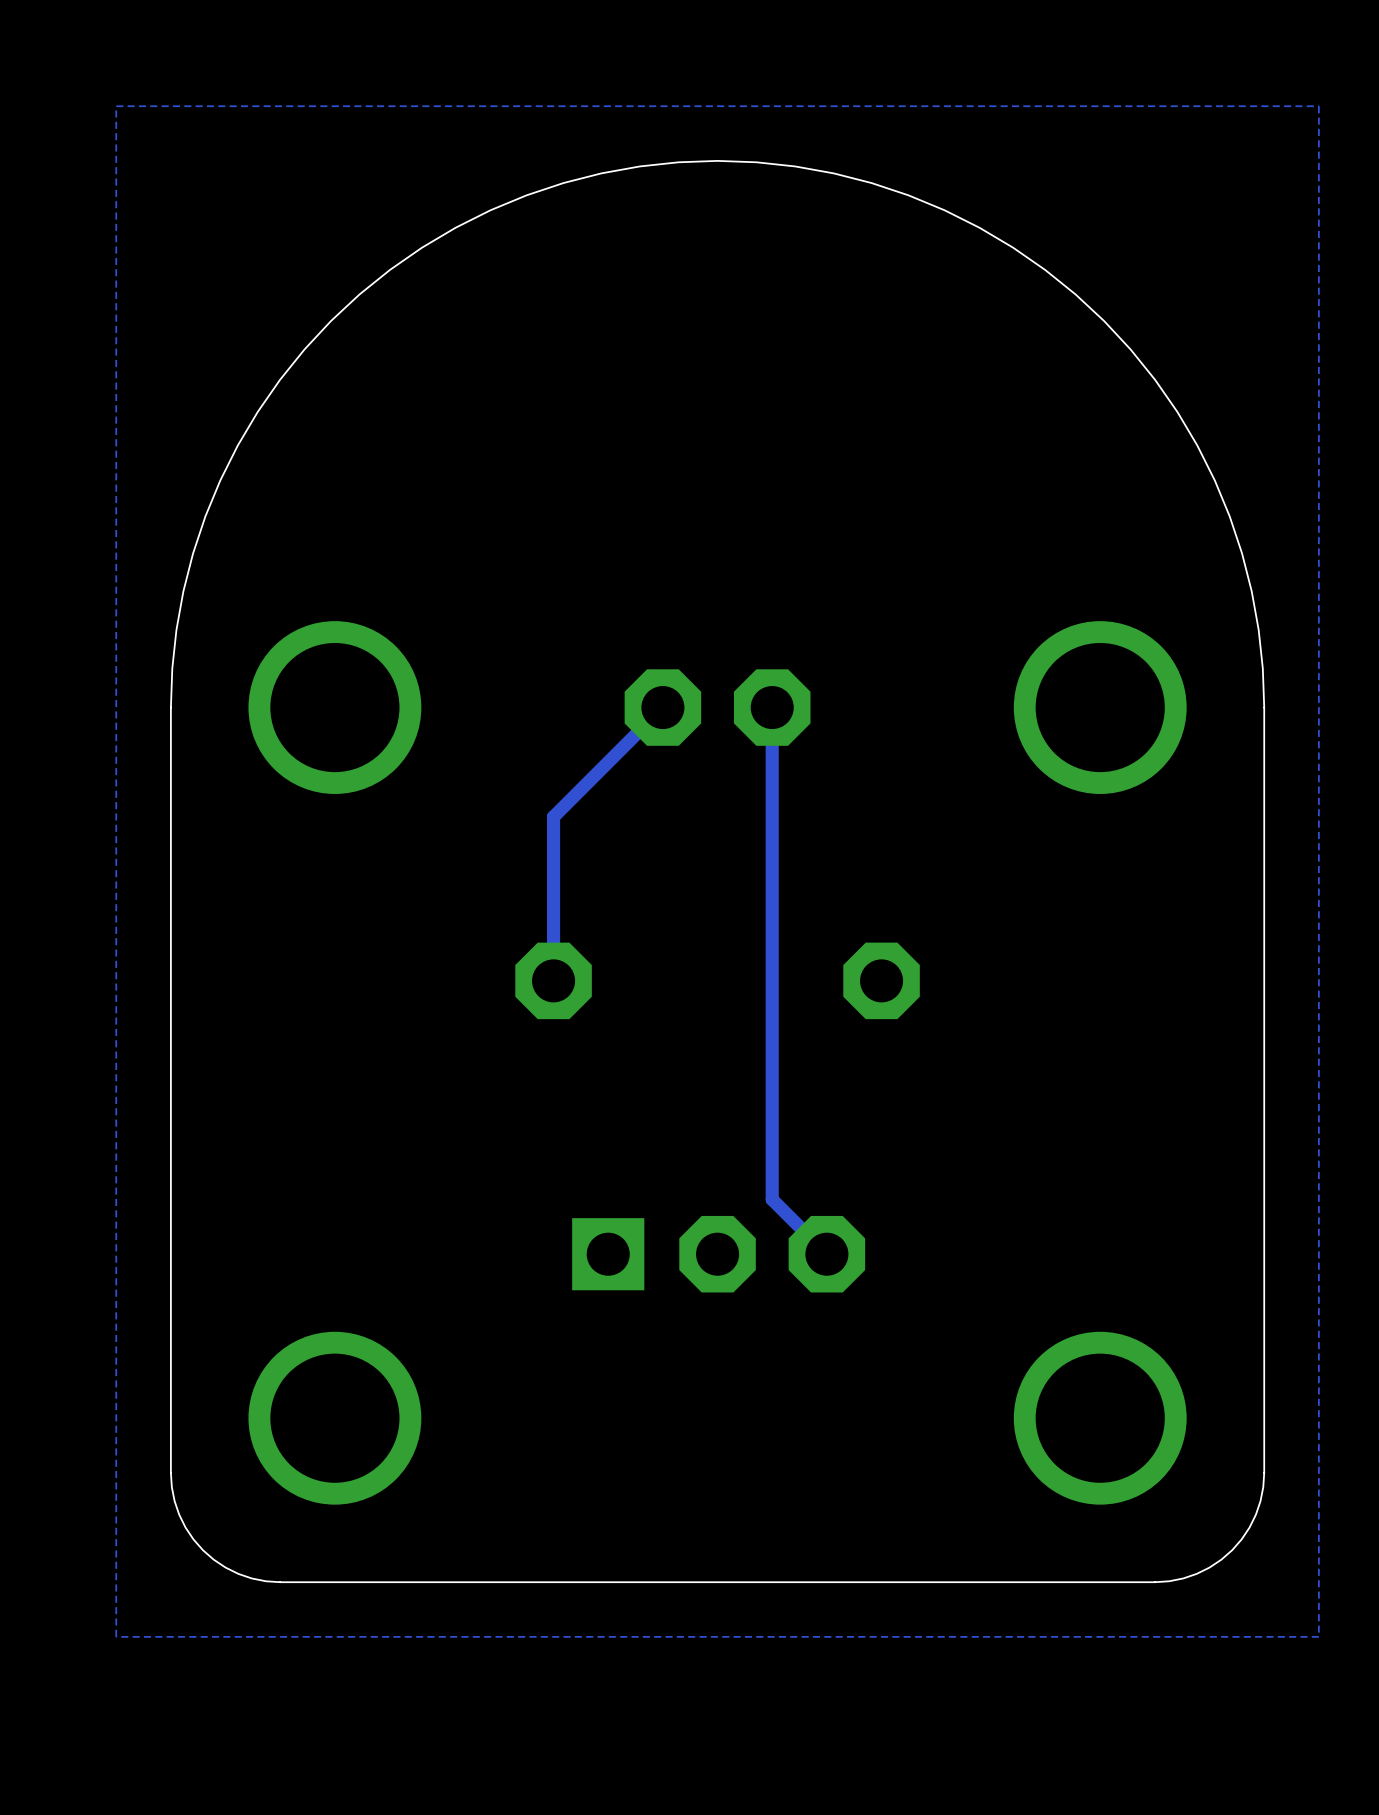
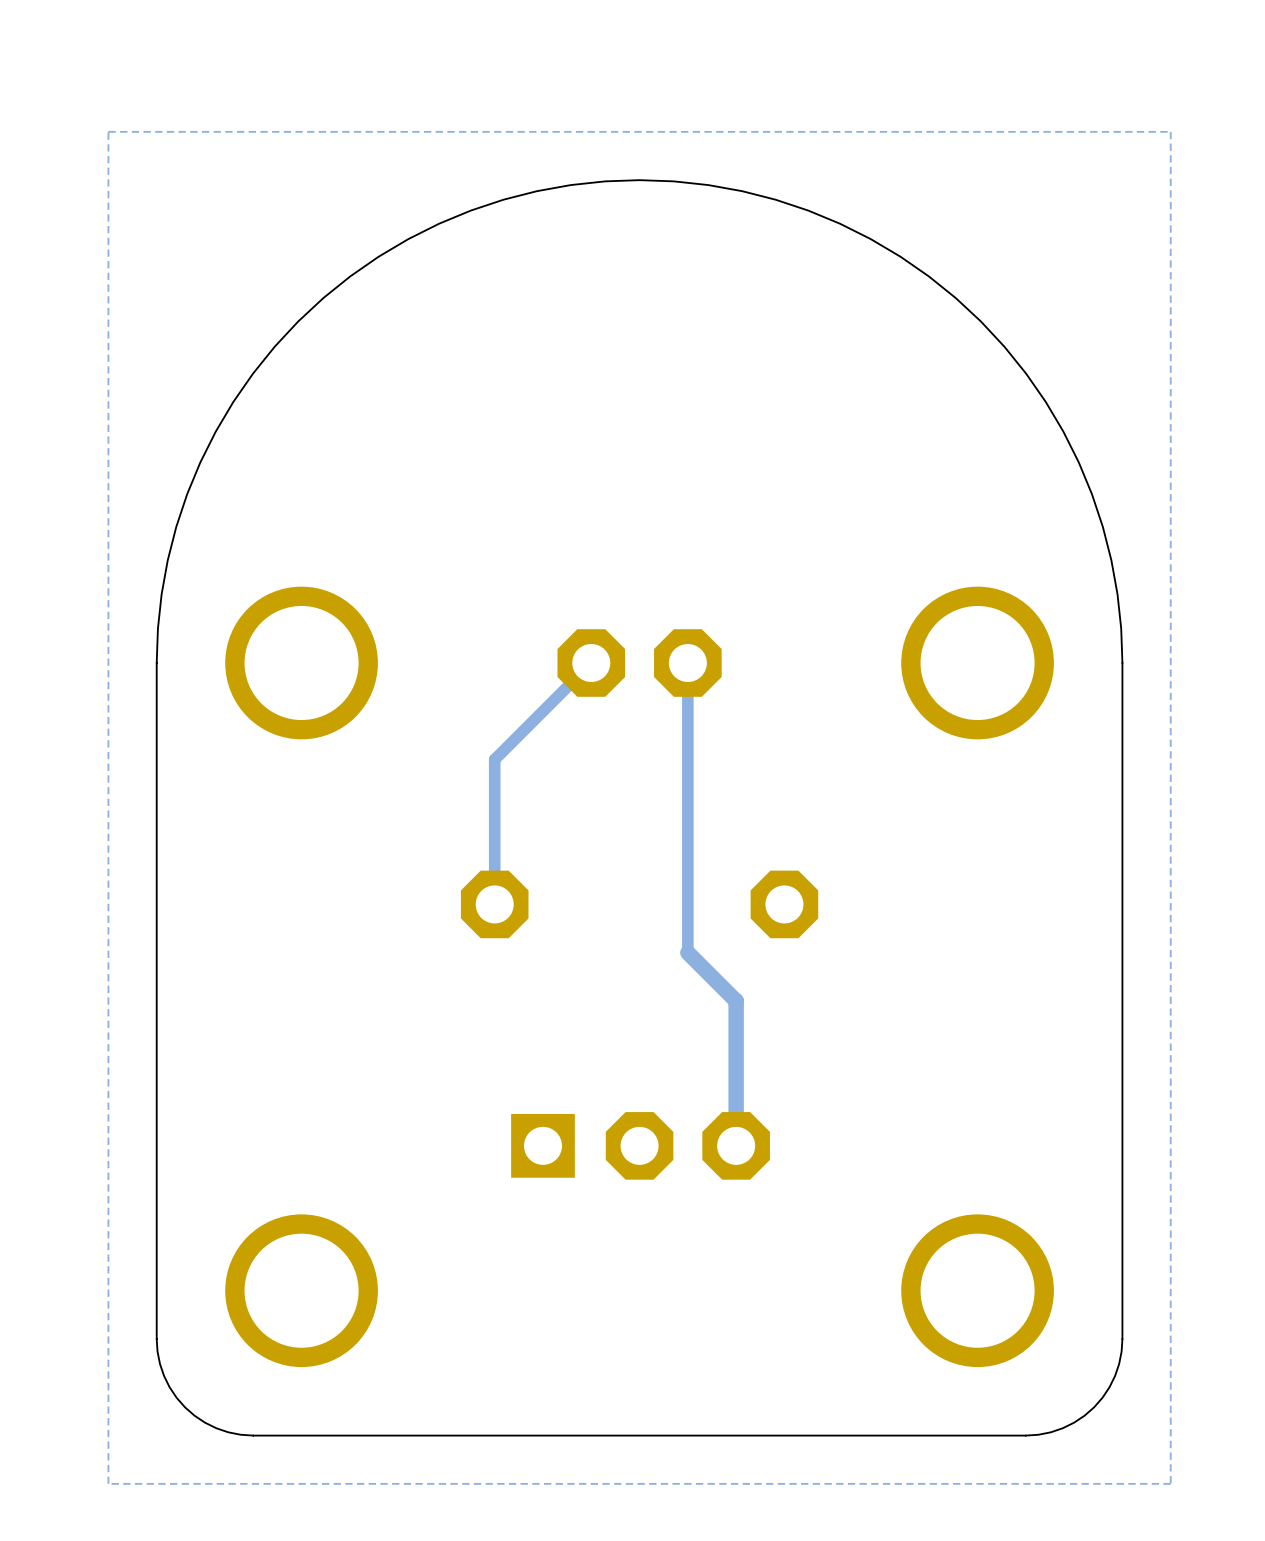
track: (772, 1035) (772, 1199) (826, 1254) -> (687, 952) (736, 1001) (736, 1145)

